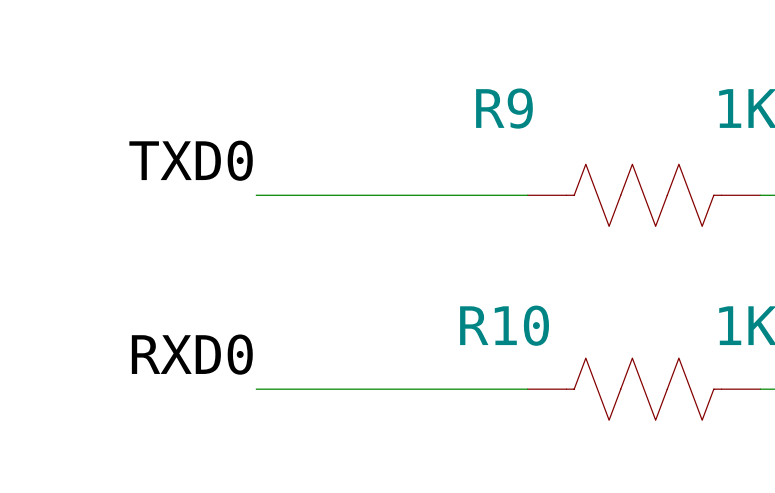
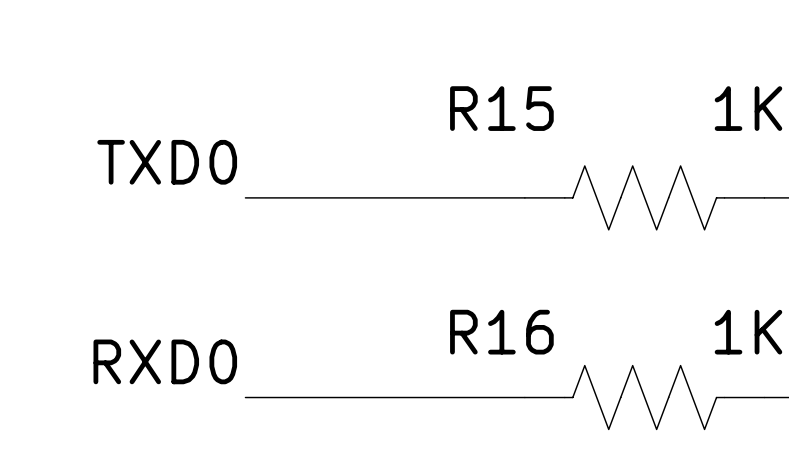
R9 name: R9 (504, 108) -> R15 (501, 108)
R10 name: R10 (504, 325) -> R16 (501, 332)

